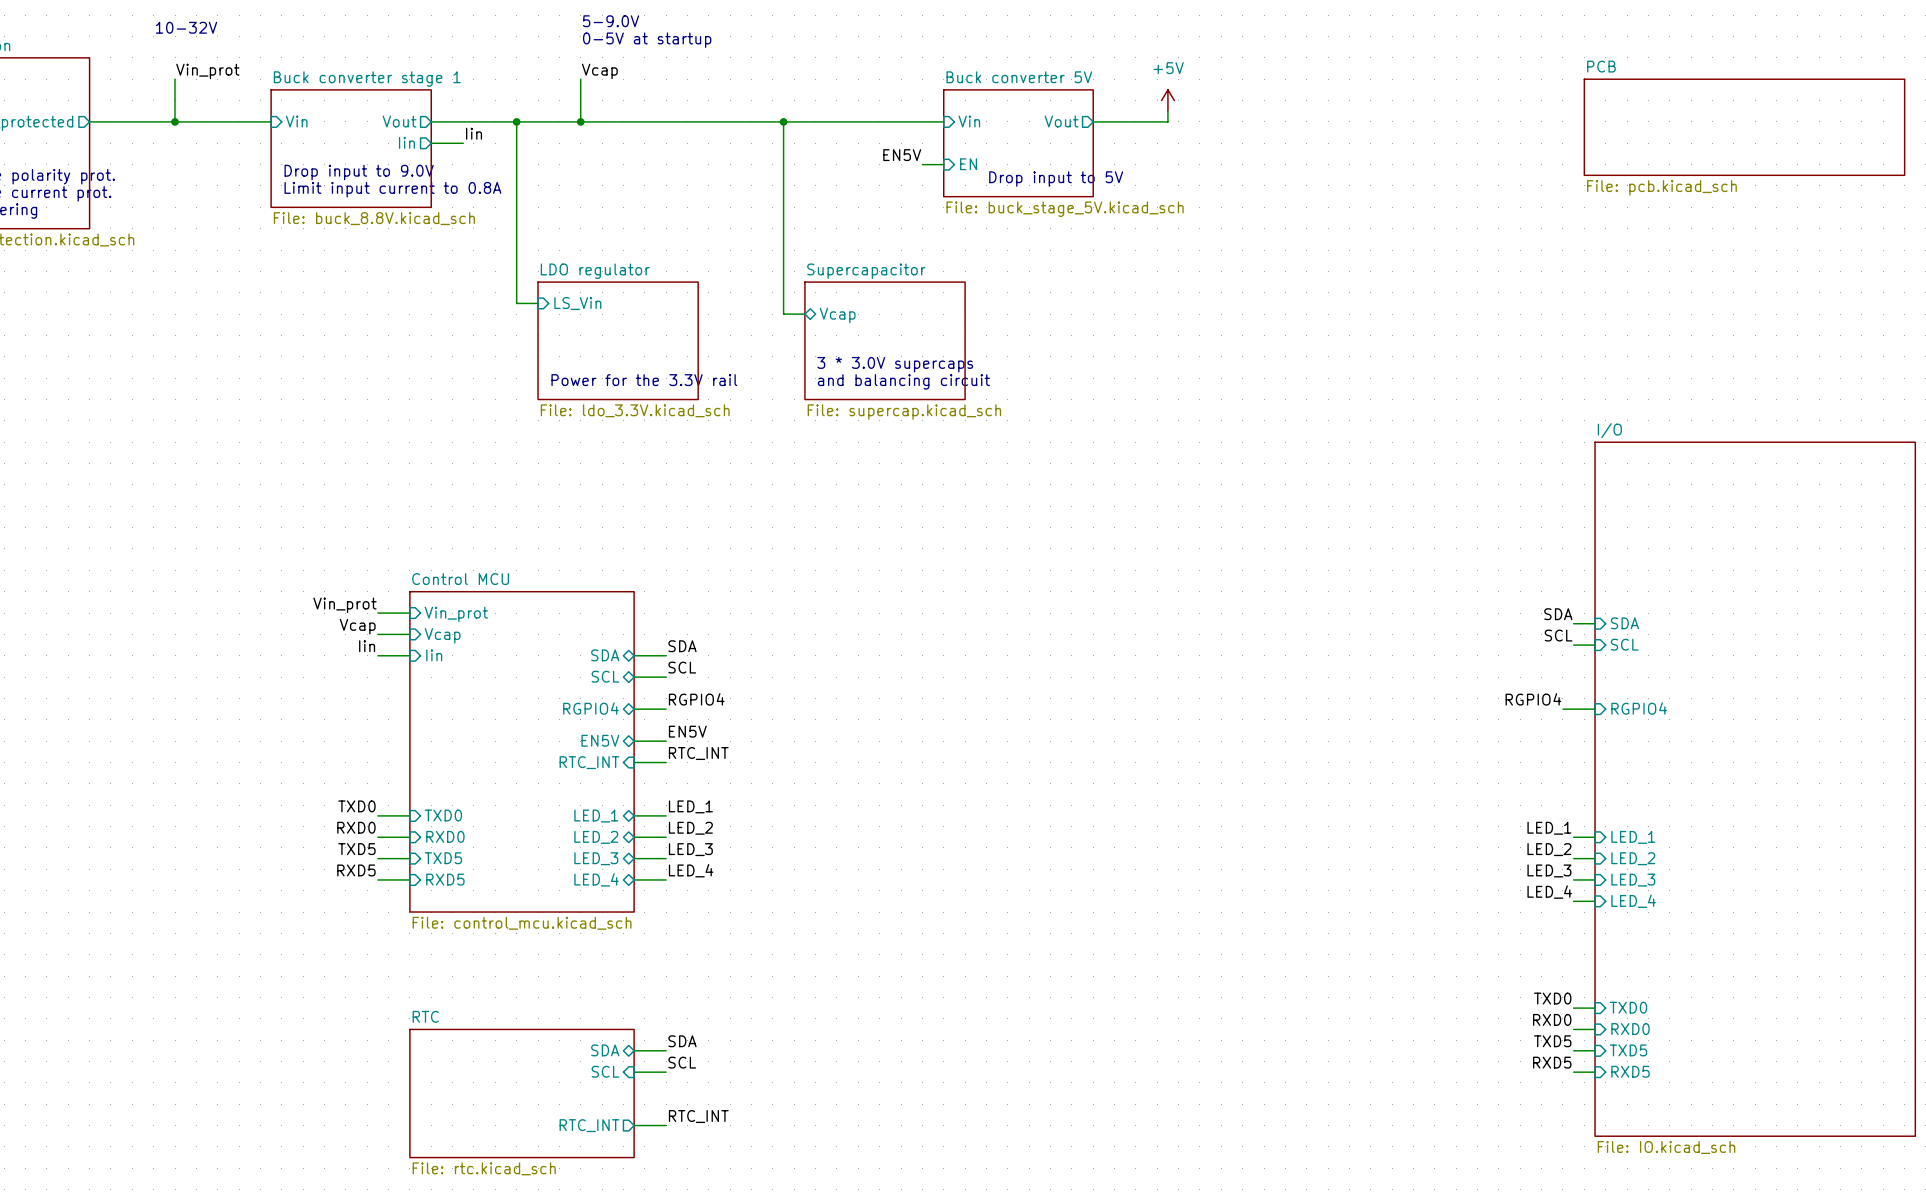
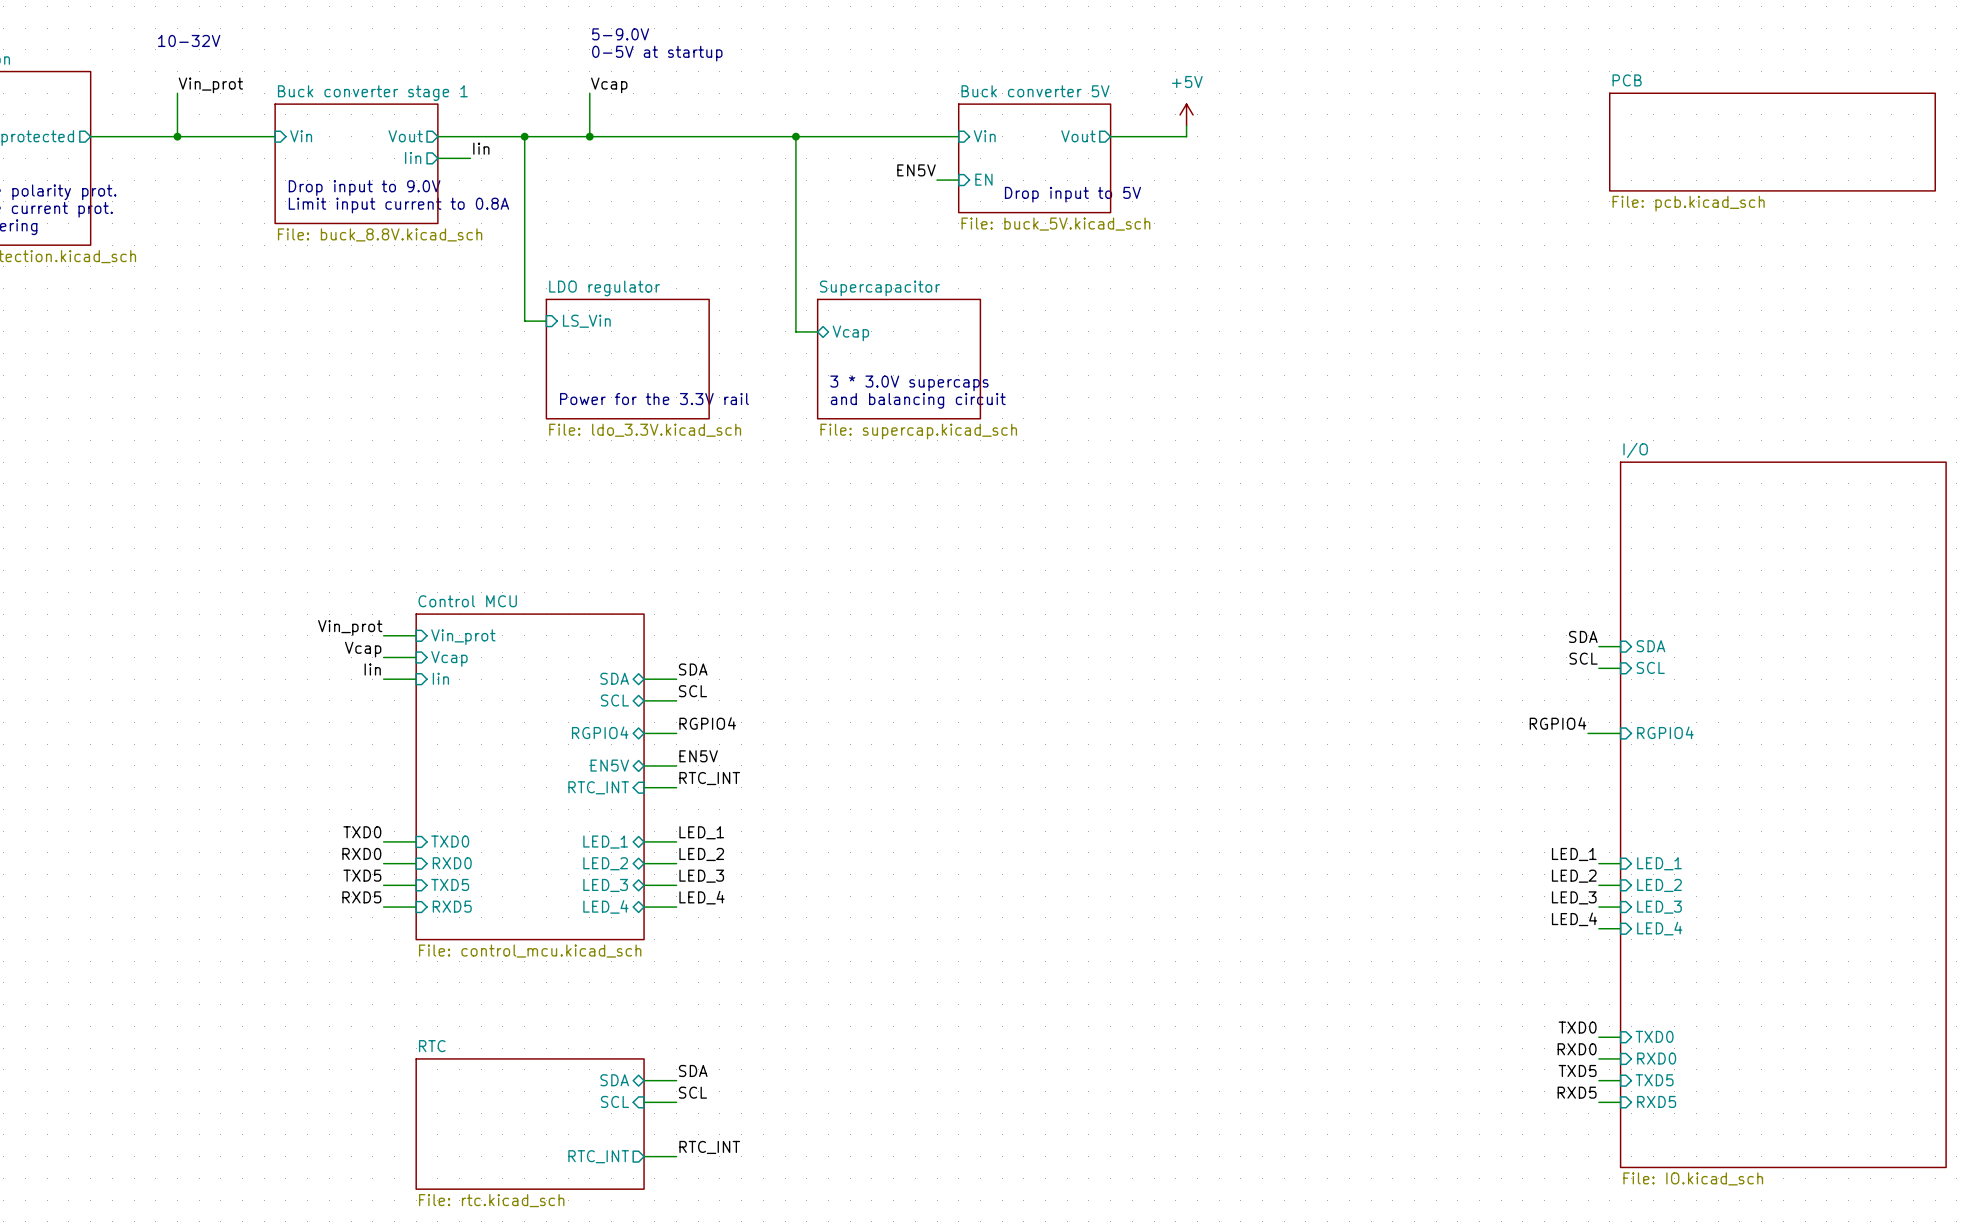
sheet Buck converter 5V value: File: buck_stage_5V.kicad_sch (1065, 209) -> File: buck_5V.kicad_sch (1055, 224)

